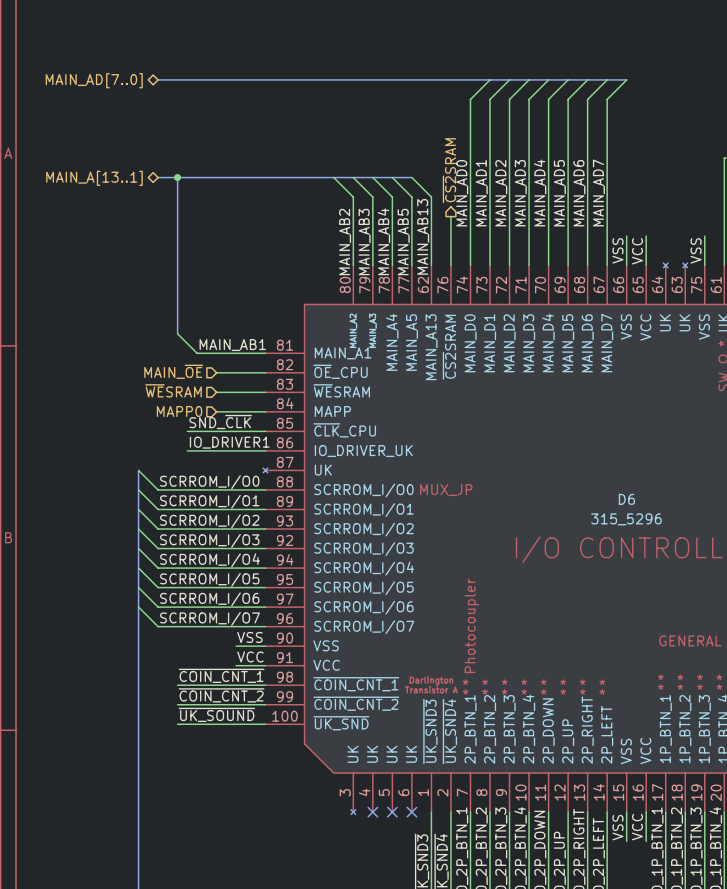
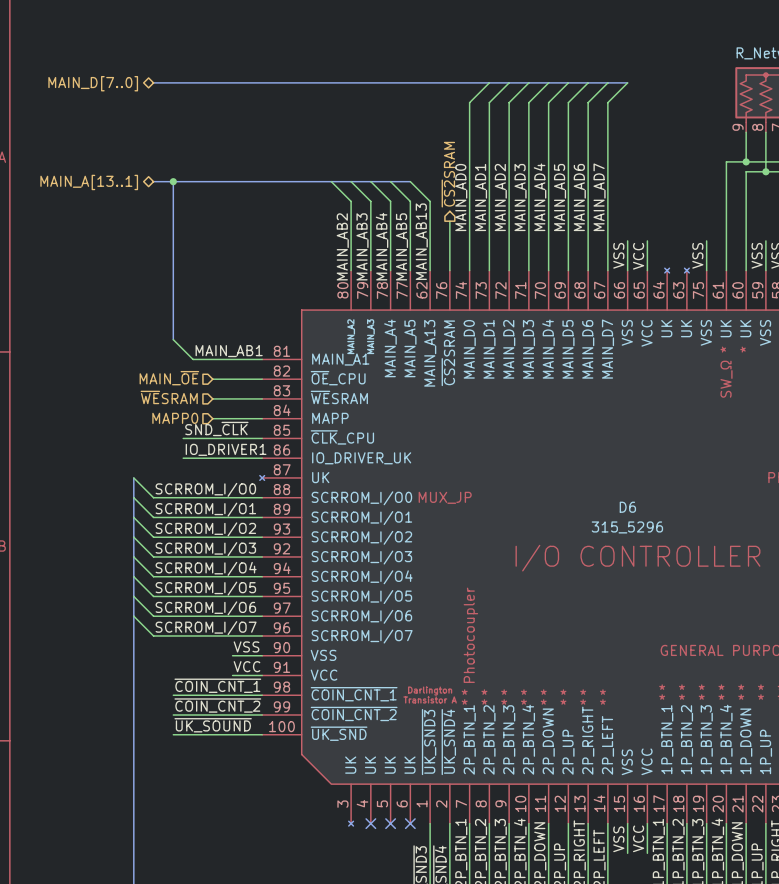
hierarchical label: MAIN_AD[7..0] (94, 80) -> MAIN_D[7..0] (93, 83)

